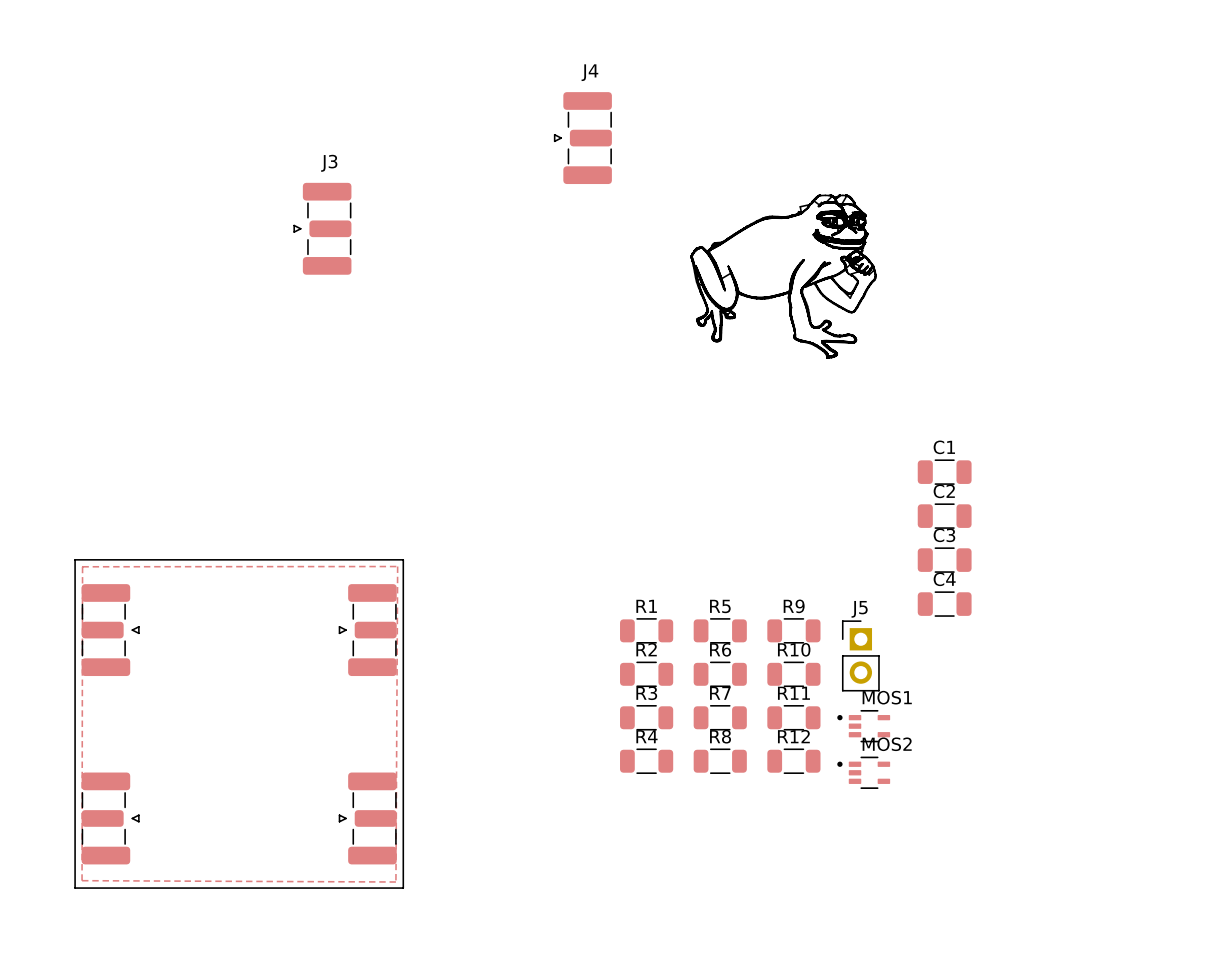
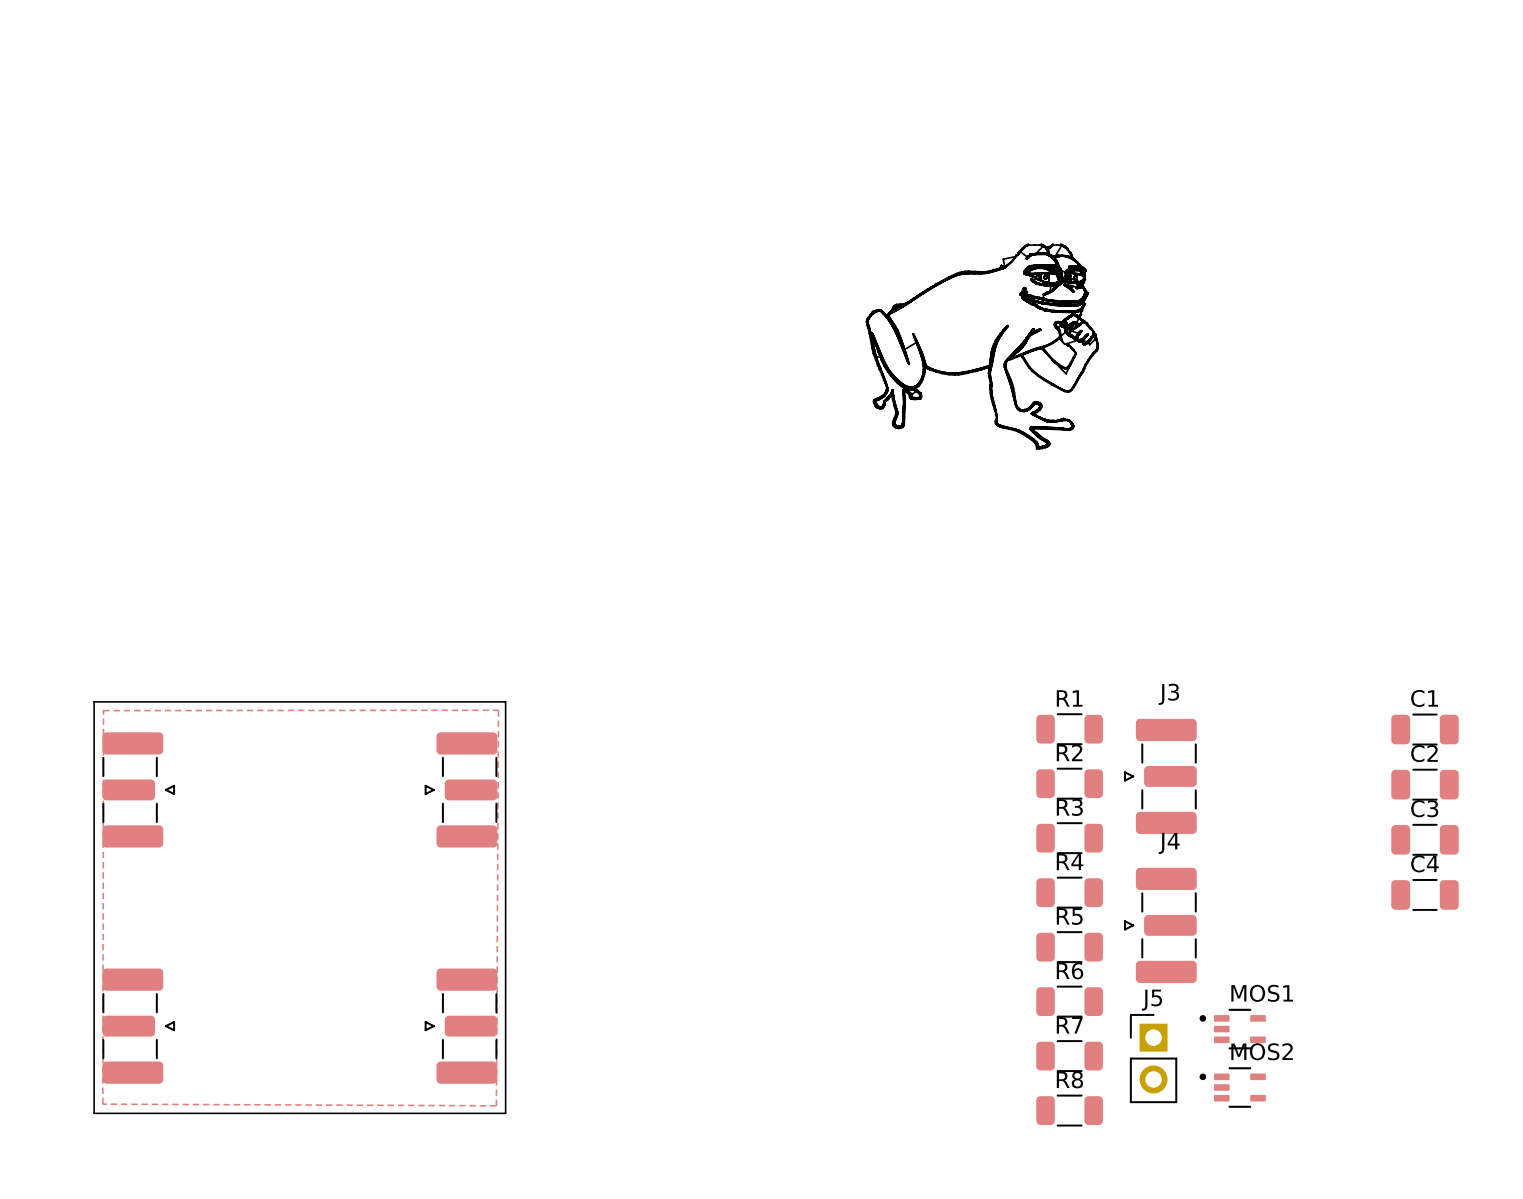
J4 position: (582, 138) -> (1160, 925)
J3 position: (322, 228) -> (1160, 776)
C1 position: (944, 472) -> (1424, 729)
C2 position: (944, 516) -> (1424, 784)
C3 position: (944, 560) -> (1424, 839)
C4 position: (944, 604) -> (1424, 894)
R1 position: (646, 630) -> (1069, 729)
R5 position: (720, 630) -> (1069, 947)
R9: (793, 630) -> none
J5 position: (860, 655) -> (1153, 1058)
R2 position: (646, 674) -> (1069, 783)
R6 position: (720, 674) -> (1069, 1001)
R10: (793, 674) -> none
R3 position: (646, 717) -> (1069, 838)
R7 position: (720, 717) -> (1069, 1056)
R11: (793, 717) -> none
MOS1 position: (863, 726) -> (1232, 1029)
R4 position: (646, 761) -> (1069, 892)
R8 position: (720, 761) -> (1069, 1110)
R12: (793, 761) -> none
MOS2 position: (863, 772) -> (1232, 1087)

